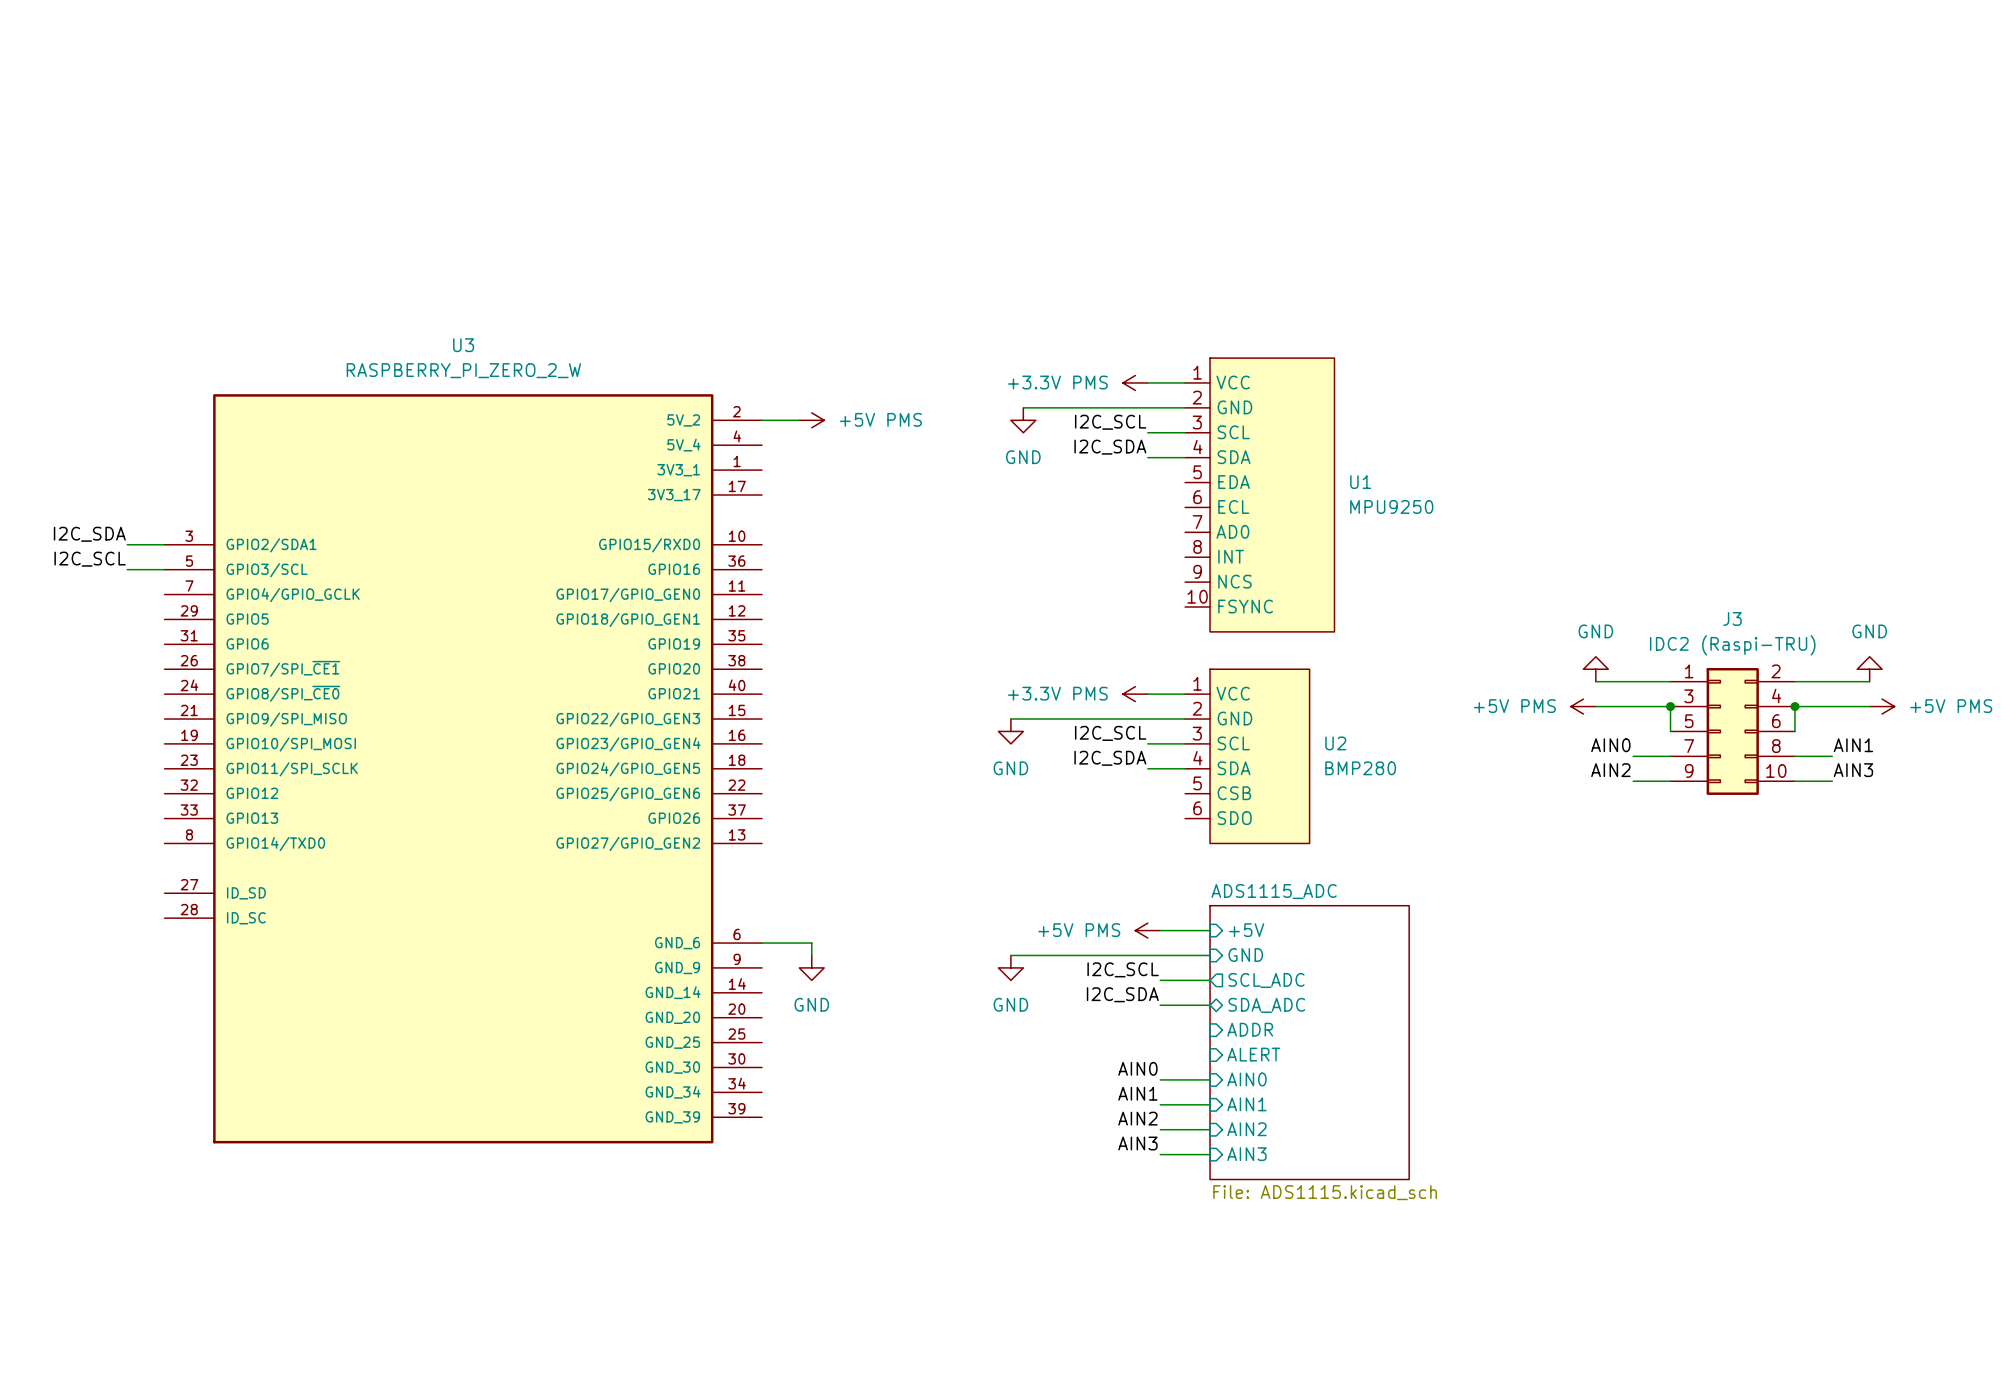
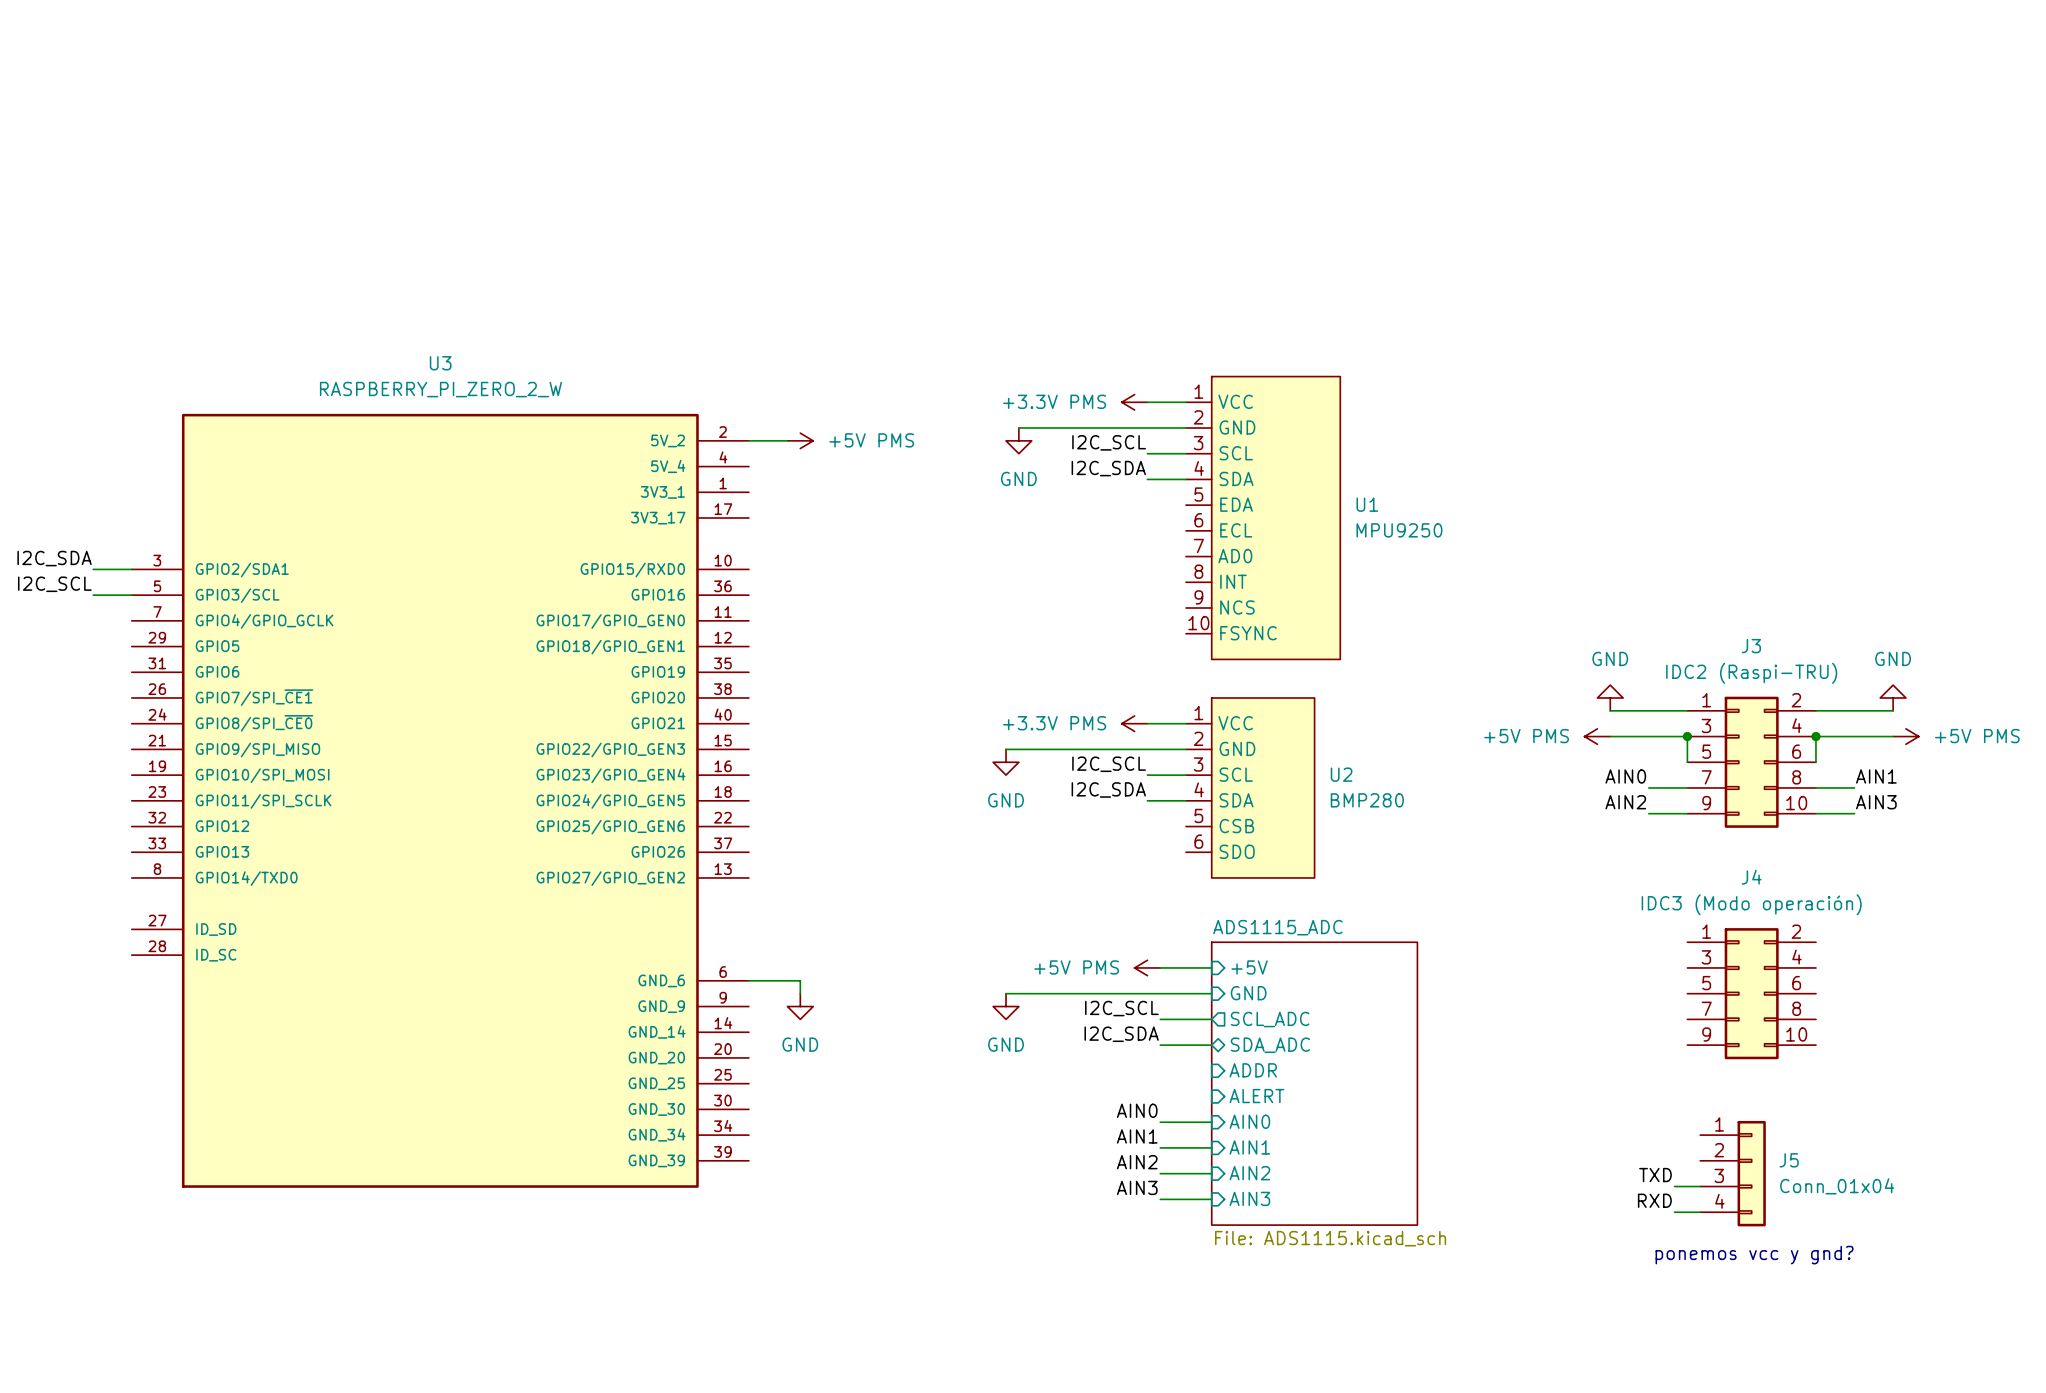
J4: none -> IDC3 (Modo operación) (1751, 993)
J5: none -> Conn_01x04 (1733, 1173)
label: none -> TXD (1655, 1175)
wire: none -> (1674, 1186) (1700, 1186)
label: none -> RXD (1654, 1200)
wire: none -> (1674, 1212) (1700, 1212)
text: none -> ponemos vcc y gnd? (1754, 1255)

